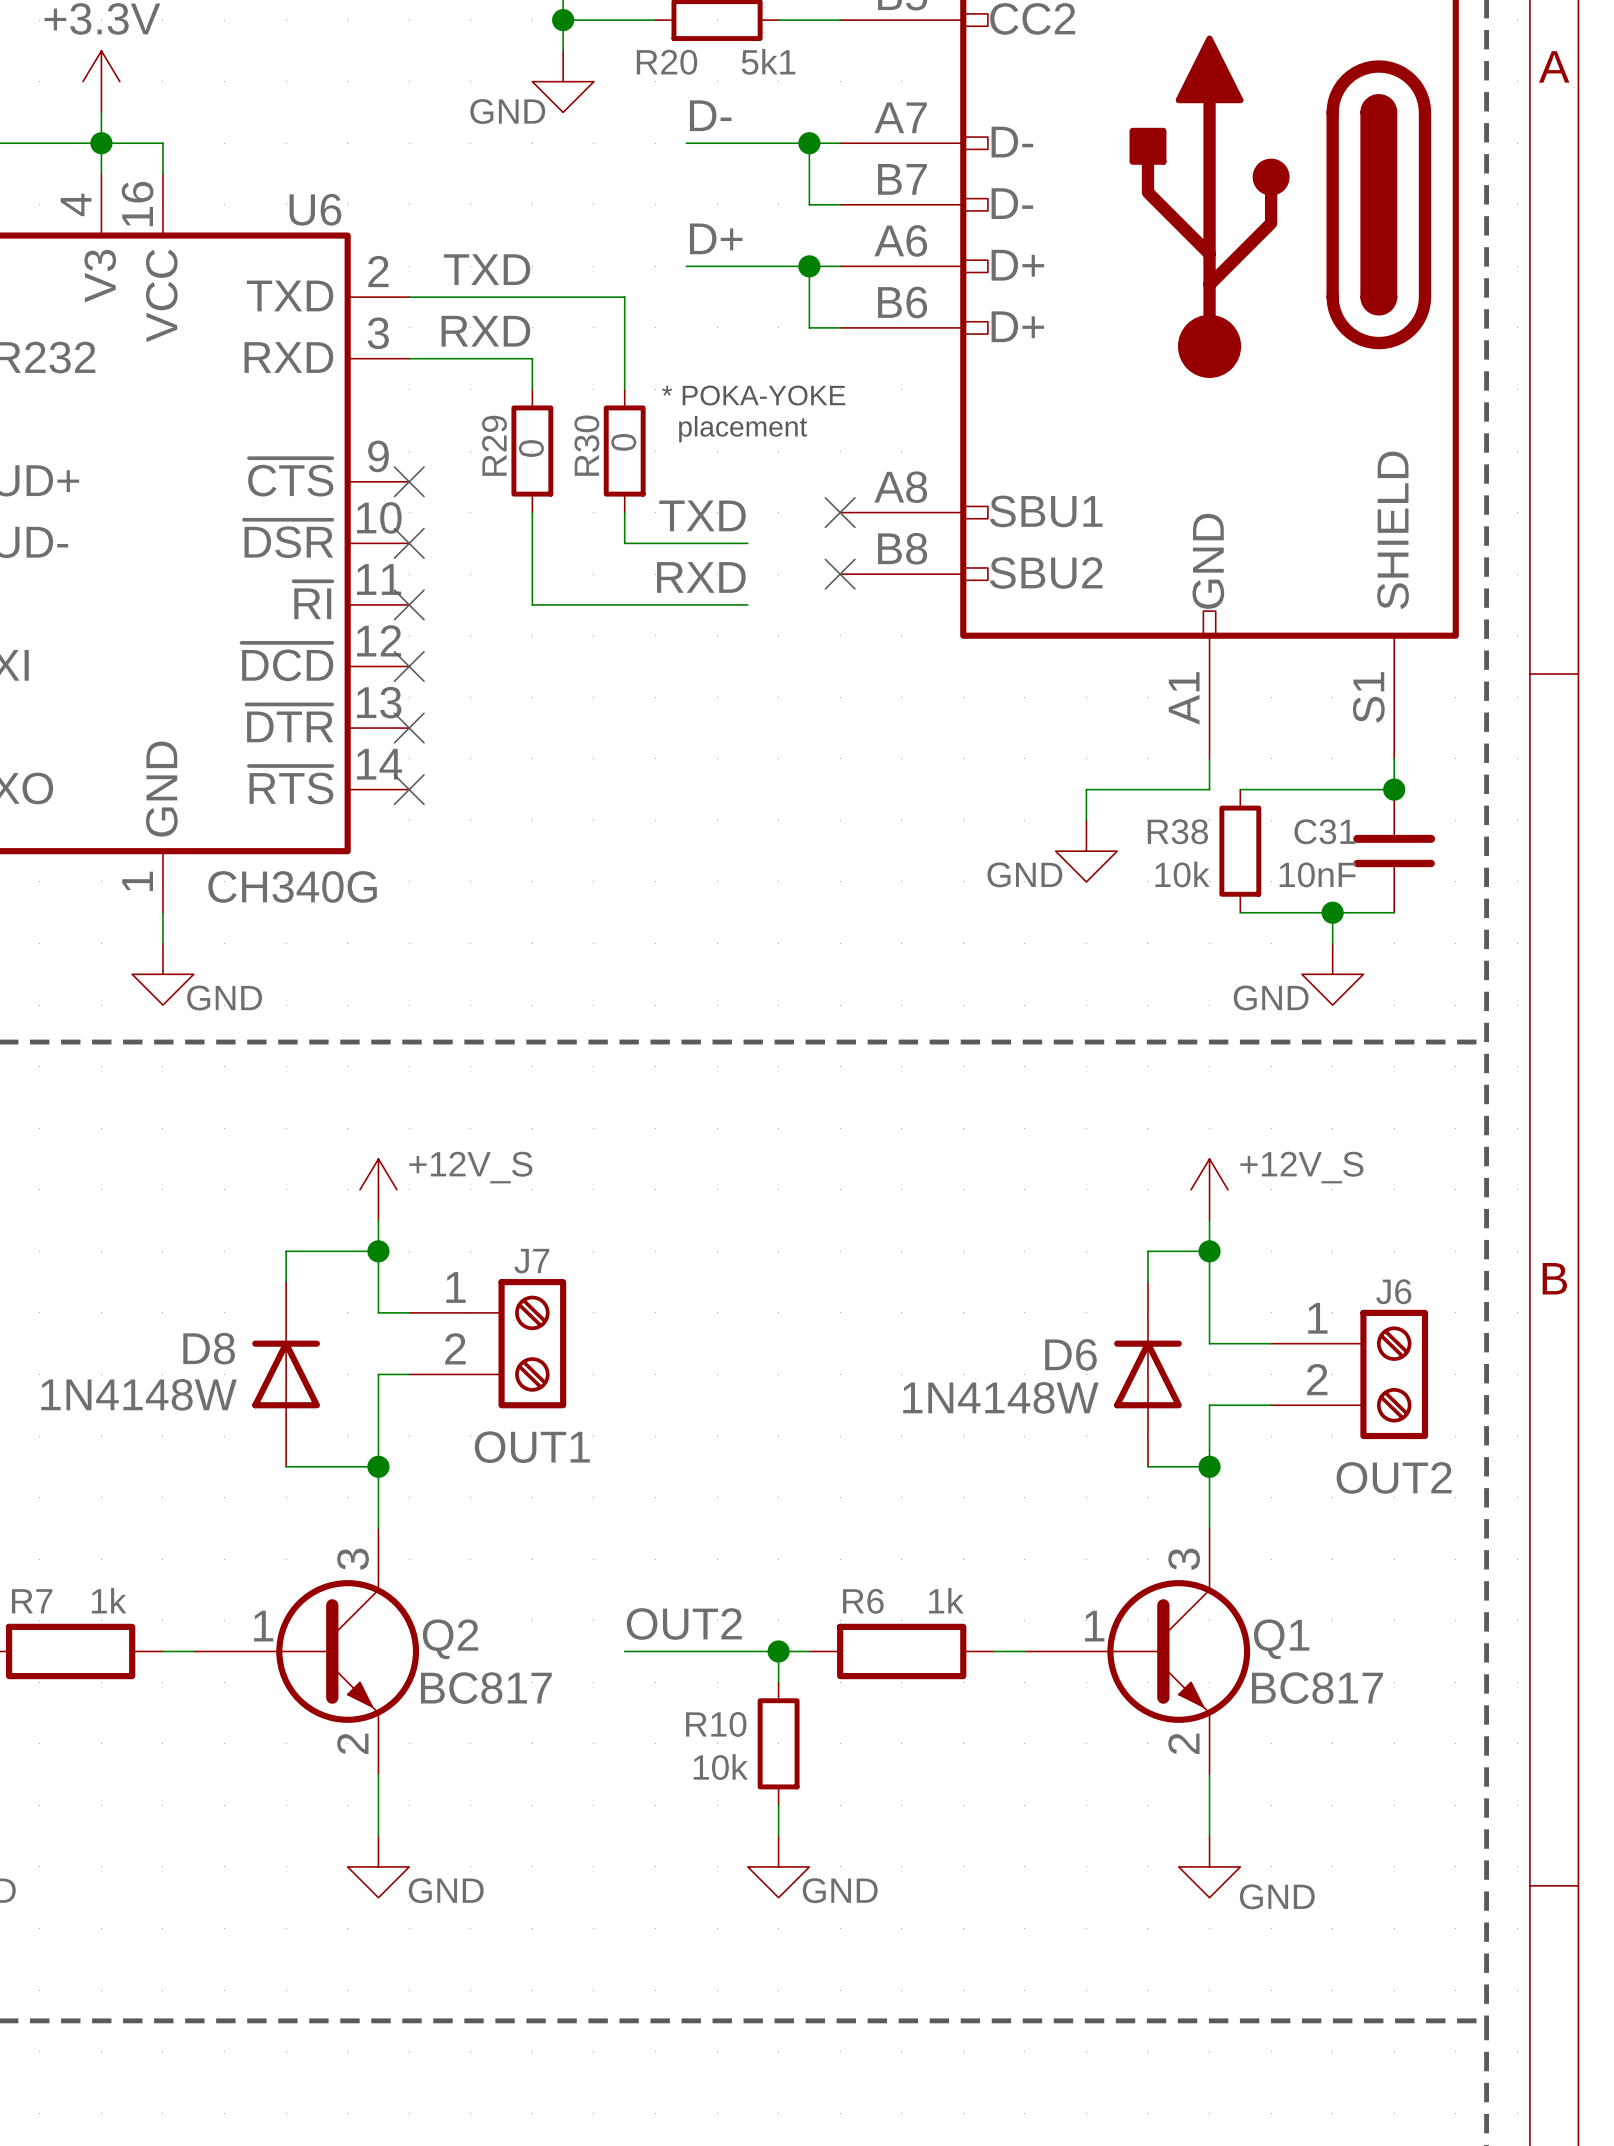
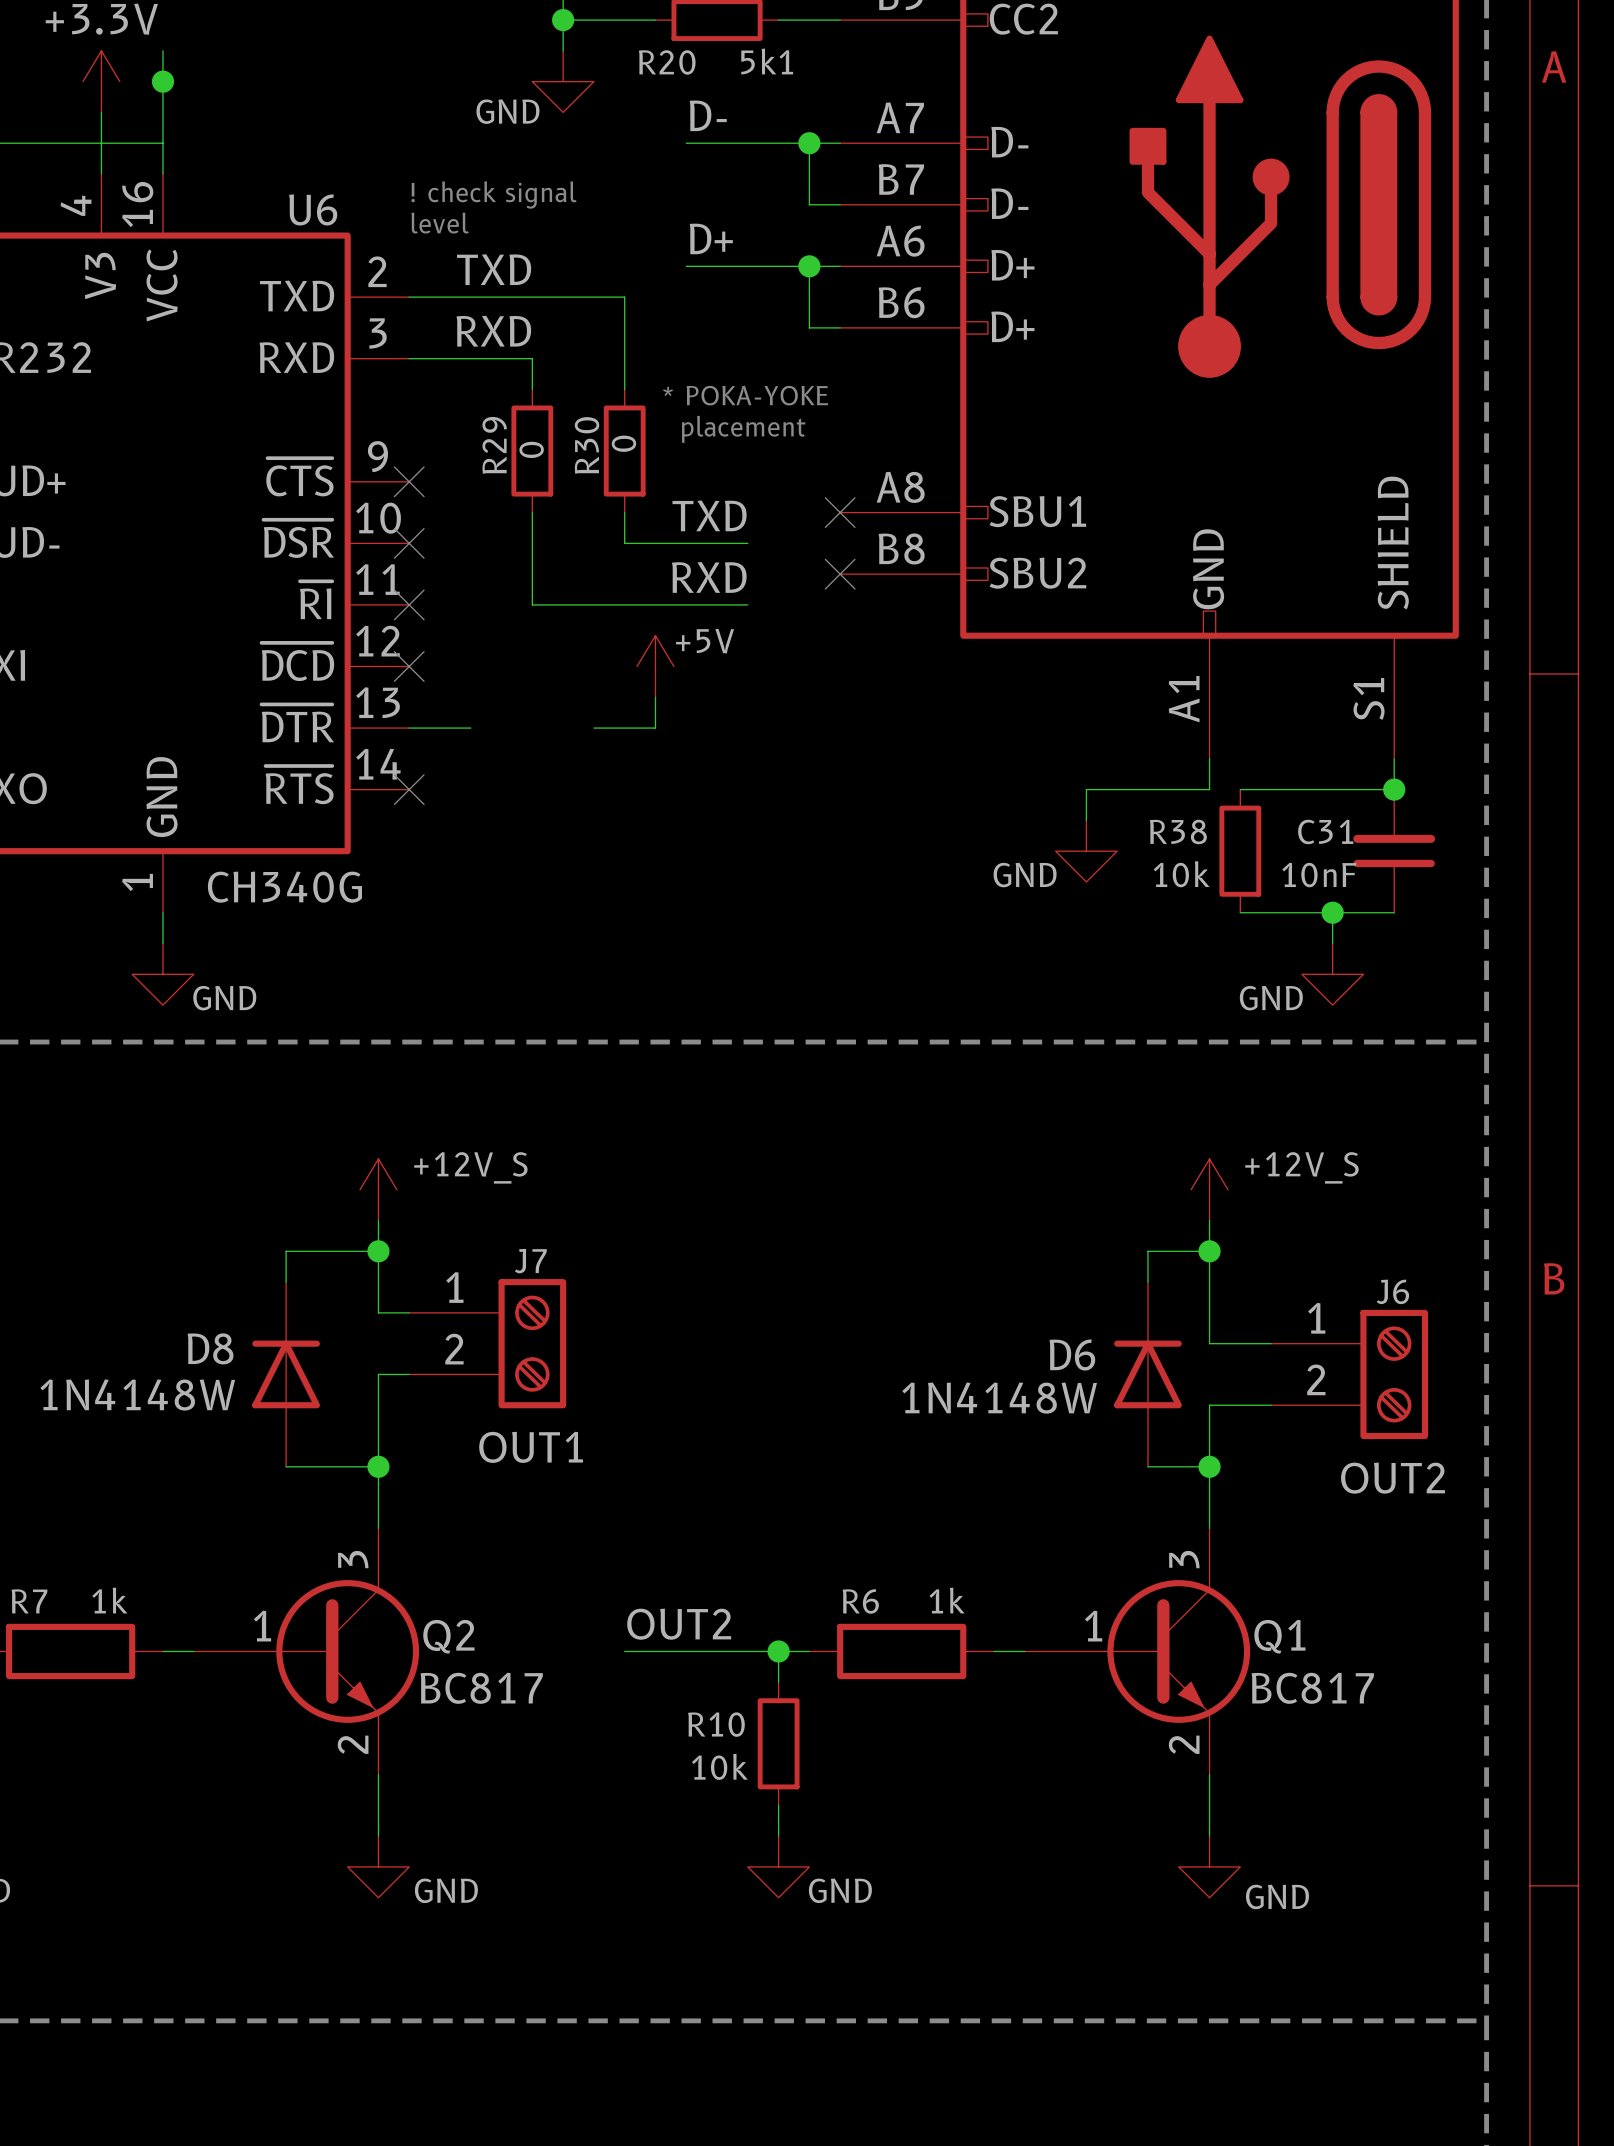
wire: none -> (162, 50) (162, 143)
junction position: (101, 143) -> (162, 81)
text: none -> ! check signal (494, 195)
text: none -> level (440, 223)
power symbol: none -> +5V (655, 666)
wire: none -> (655, 697) (655, 728) (593, 728)
wire: none -> (409, 728) (470, 728)
no-connect mark: (409, 728) -> none

